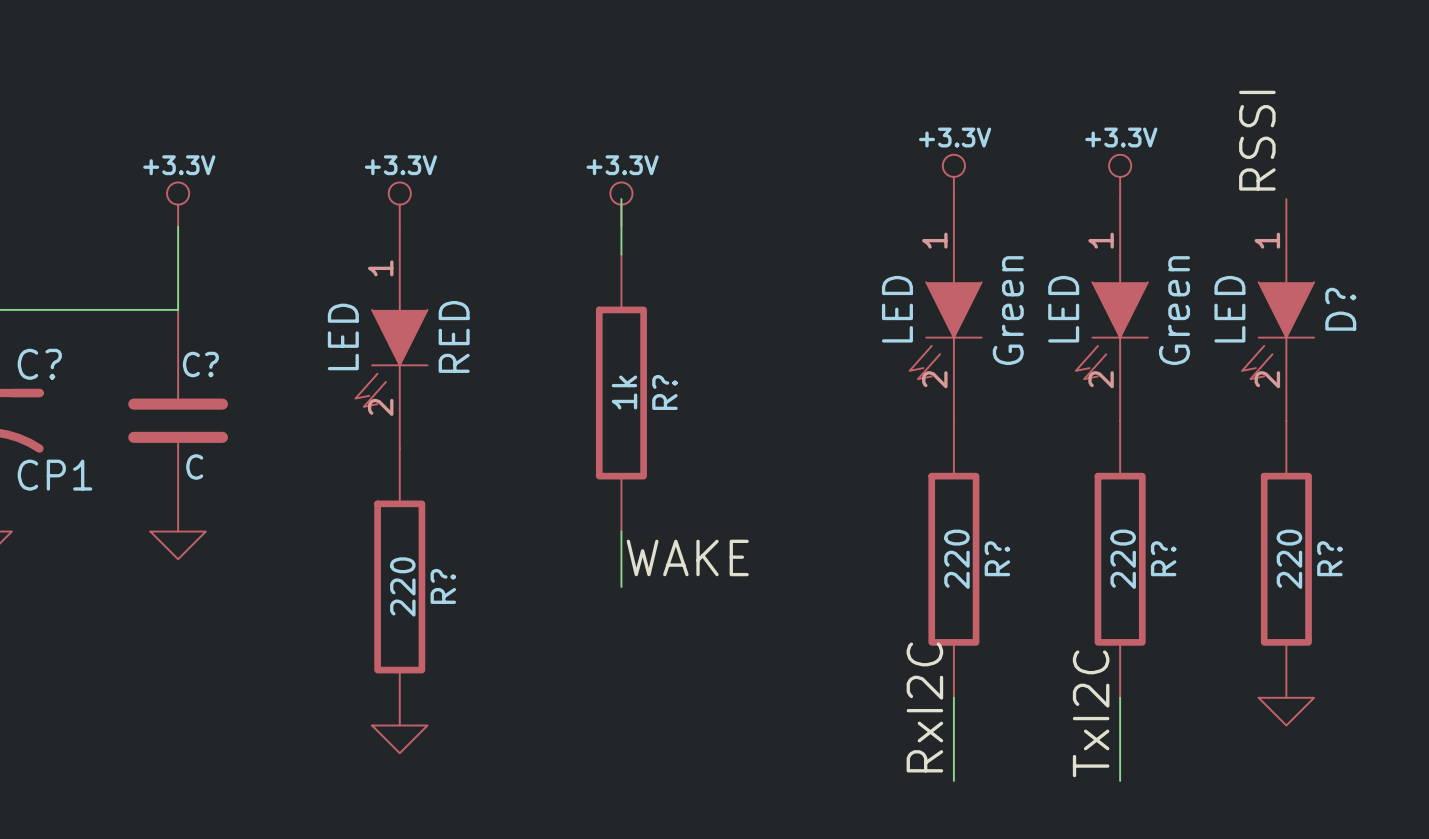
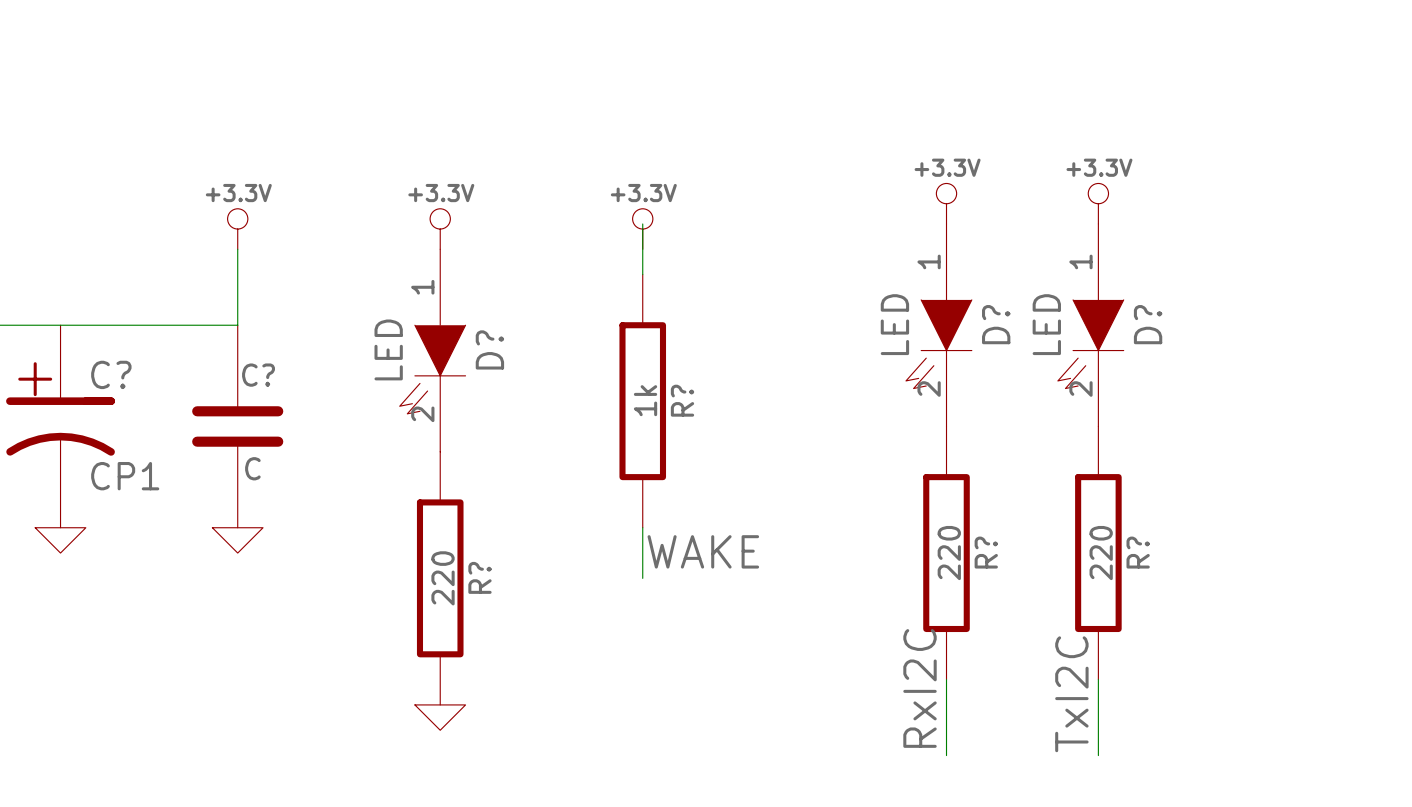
label: RSSI (1257, 140) -> none
D?: LED (1278, 309) -> none
Green name: Green (1008, 310) -> D? (996, 324)
Green name: Green (1174, 310) -> D? (1148, 324)
RED name: RED (454, 336) -> D? (489, 349)
R?: 220 (1286, 559) -> none
power symbol: (1286, 711) -> none

